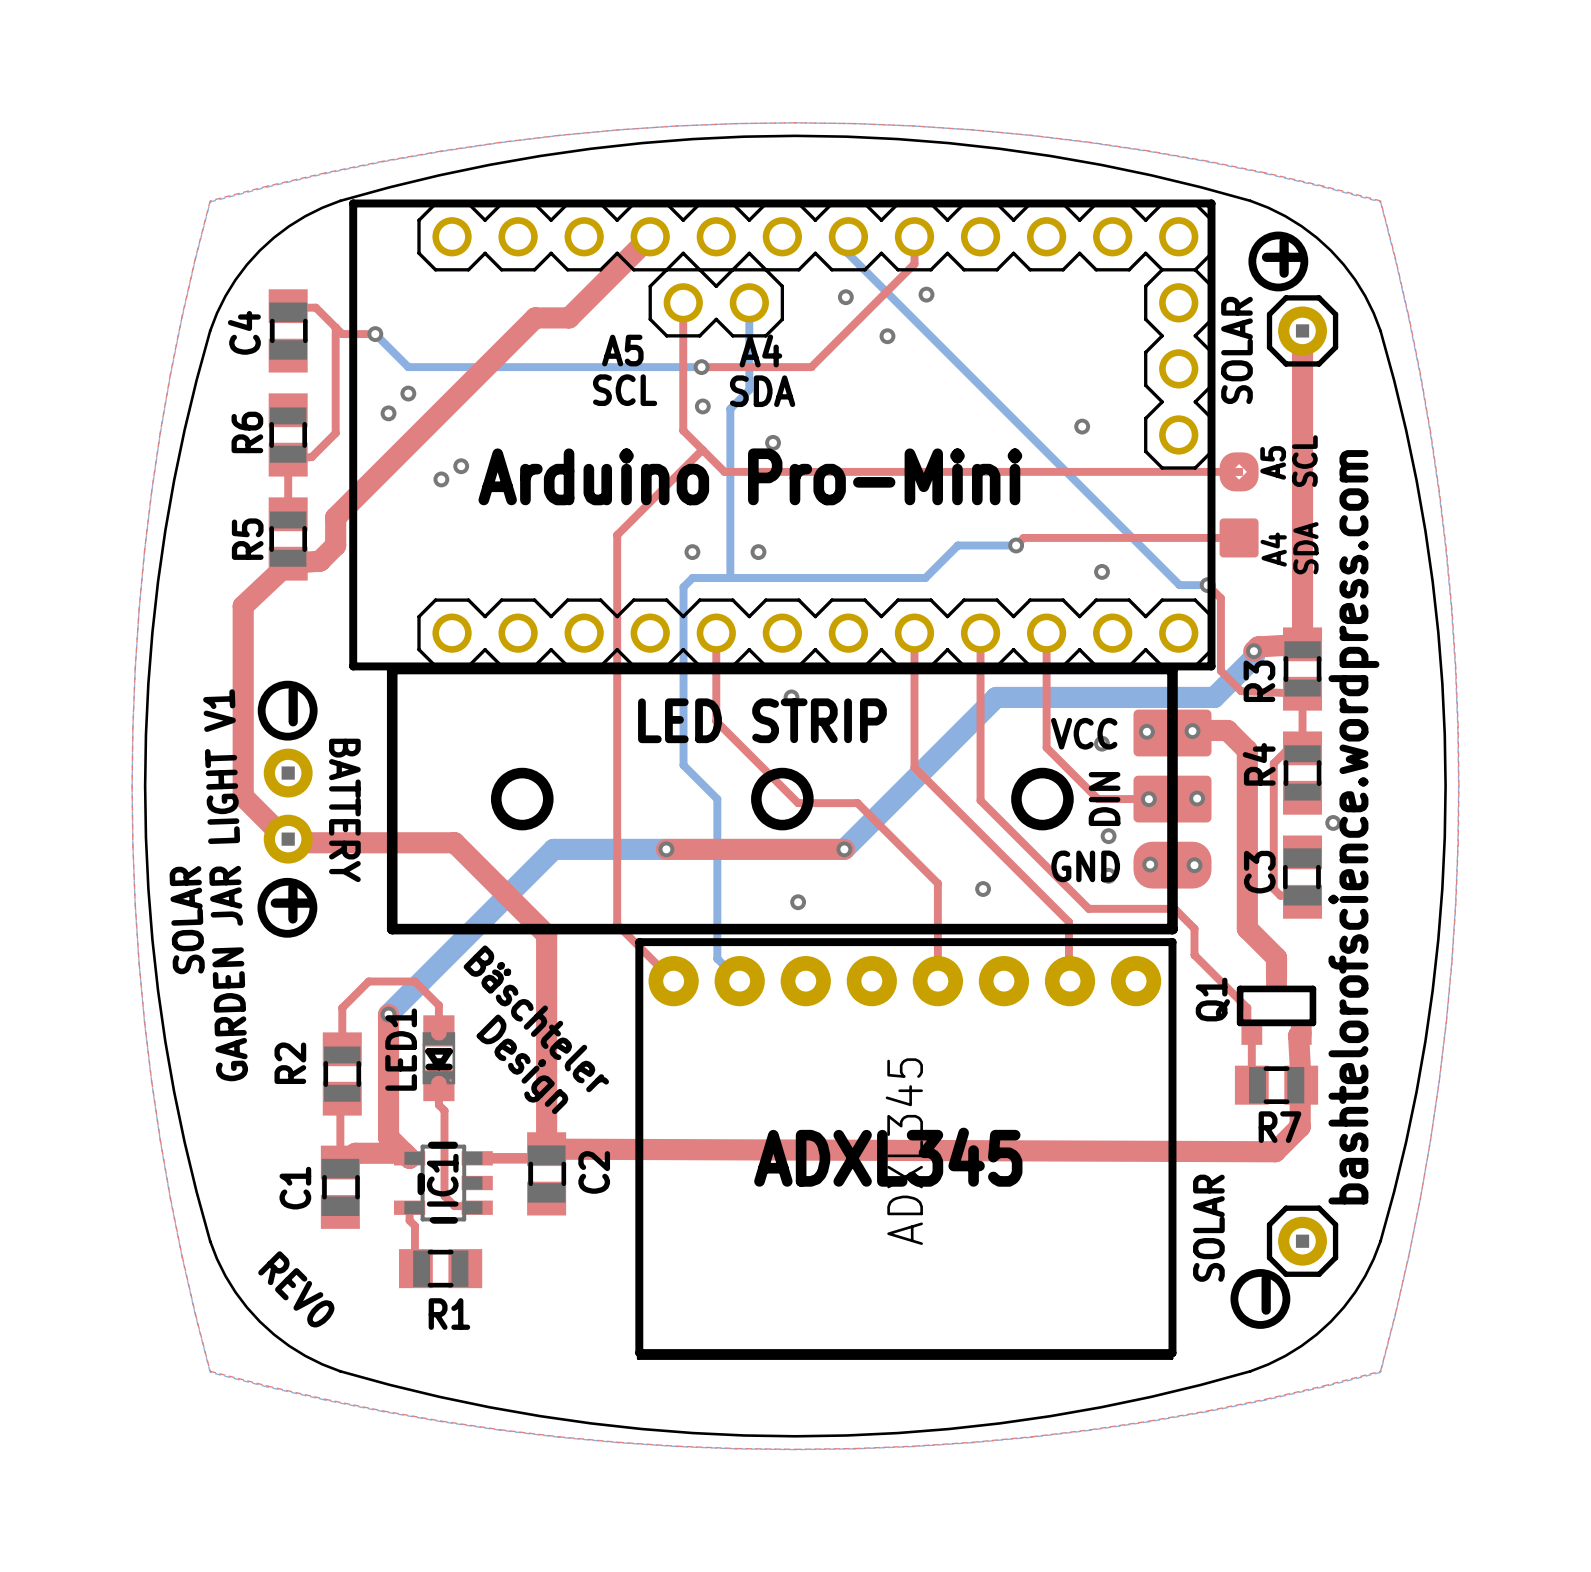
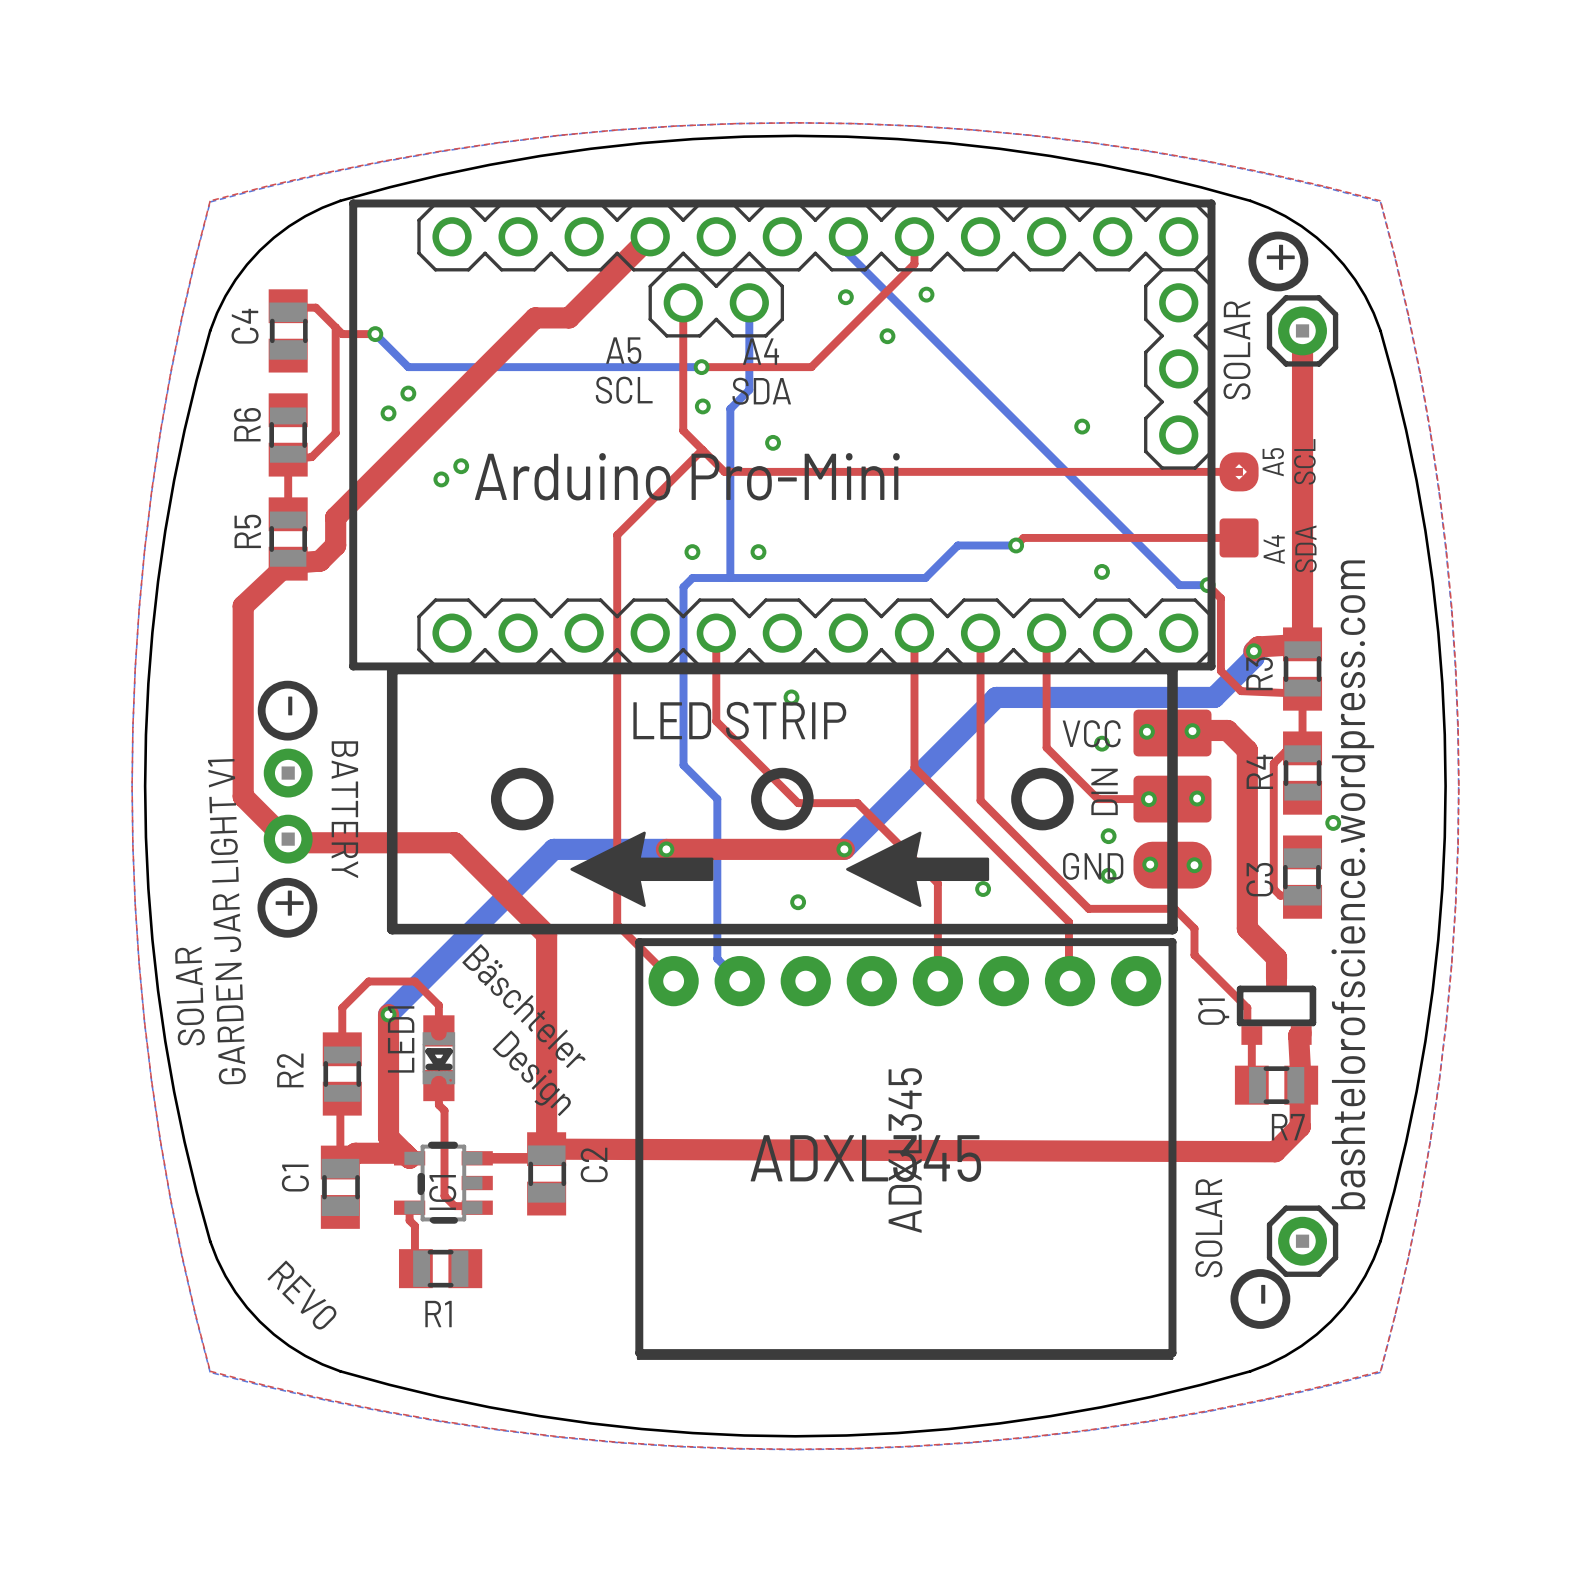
drawing: none -> [570, 831, 714, 908]
drawing: none -> [846, 831, 990, 908]

